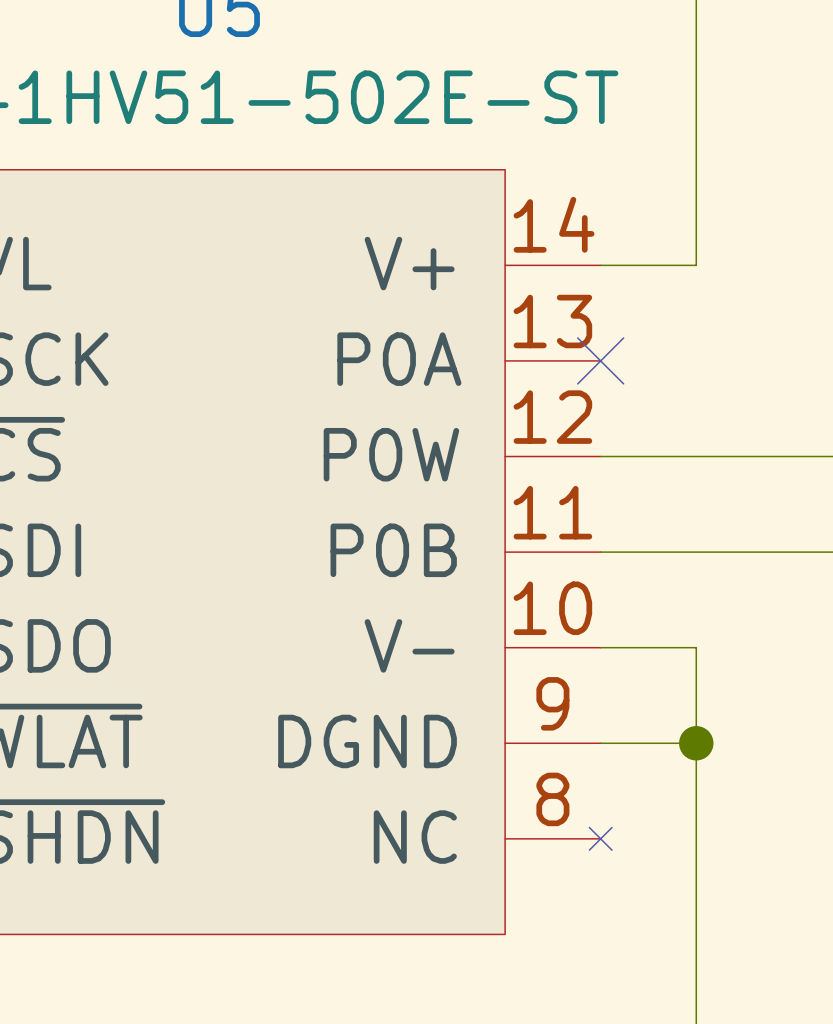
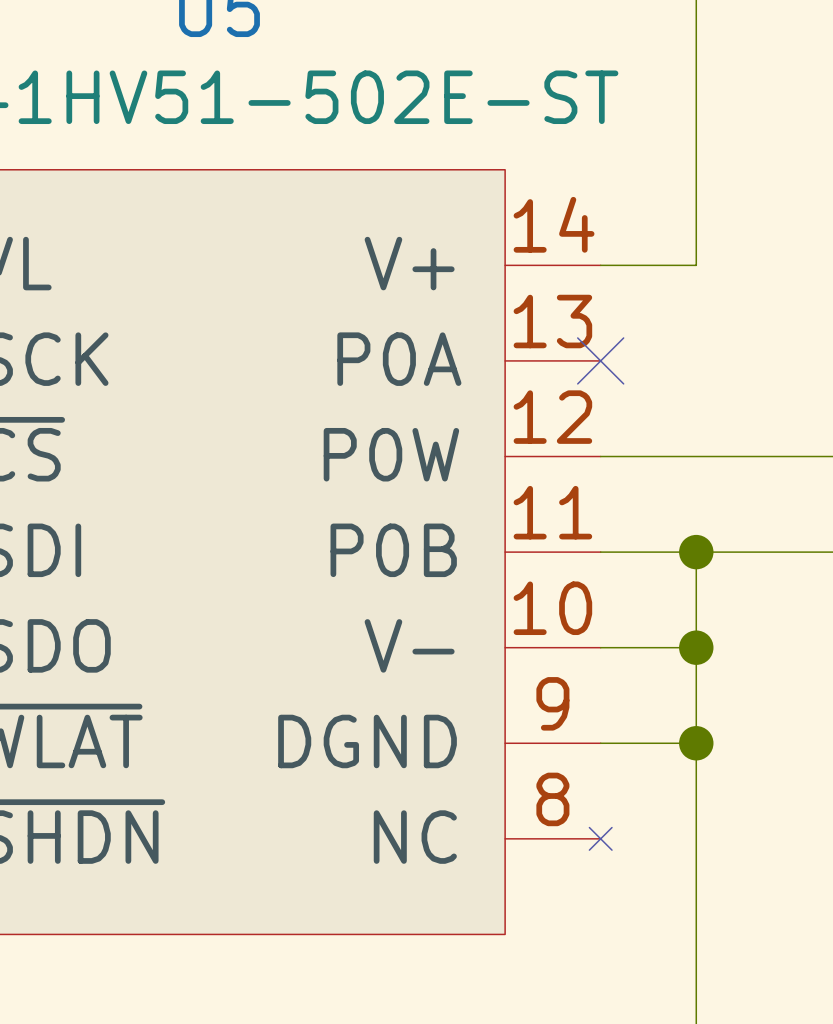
wire: none -> (696, 552) (696, 647)
junction: none -> (696, 552)
junction: none -> (696, 647)

